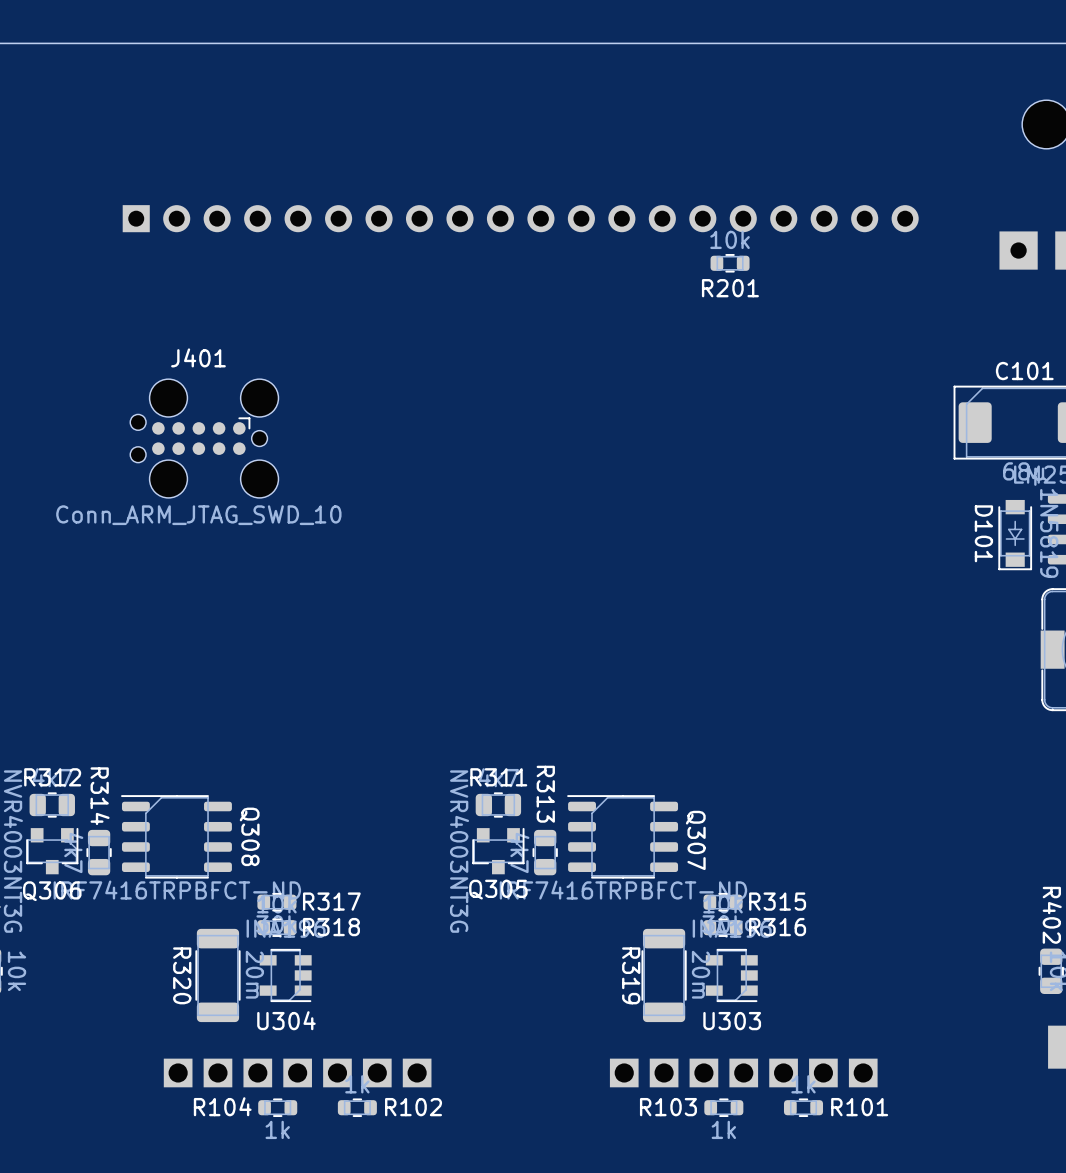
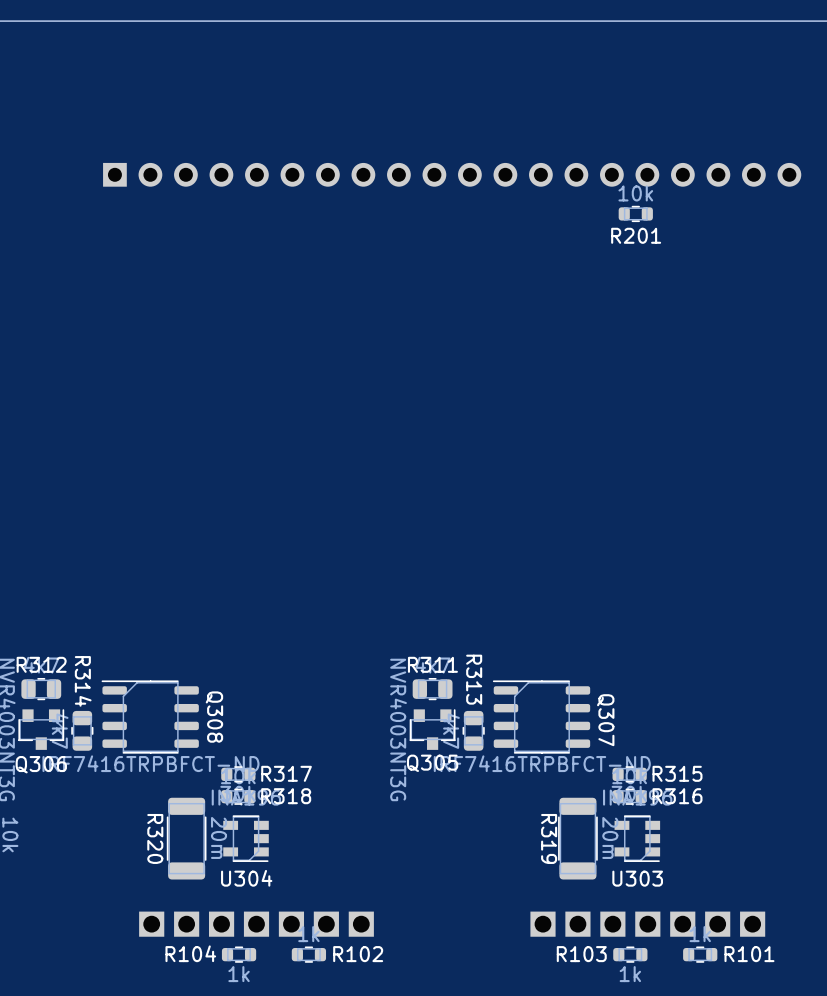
J401: Conn_ARM_JTAG_SWD_10 (204, 438) -> none

